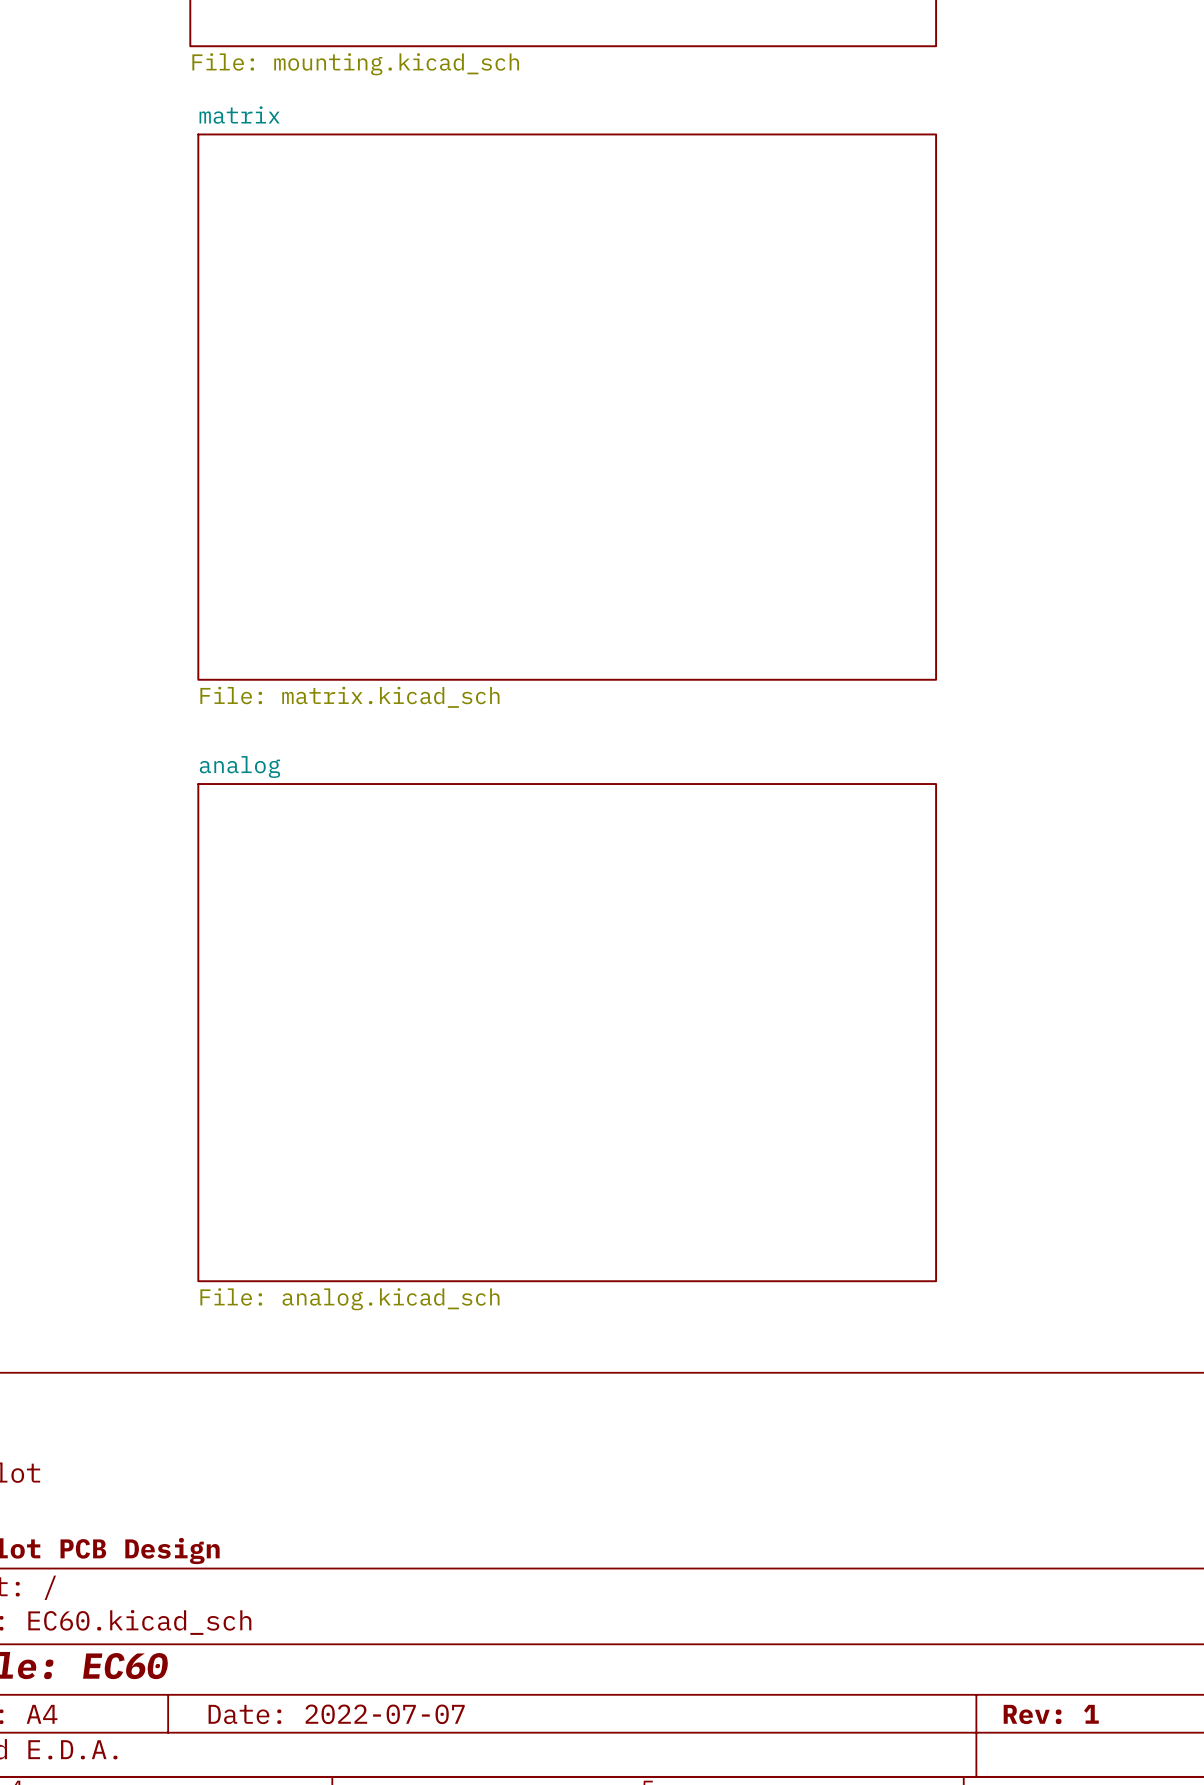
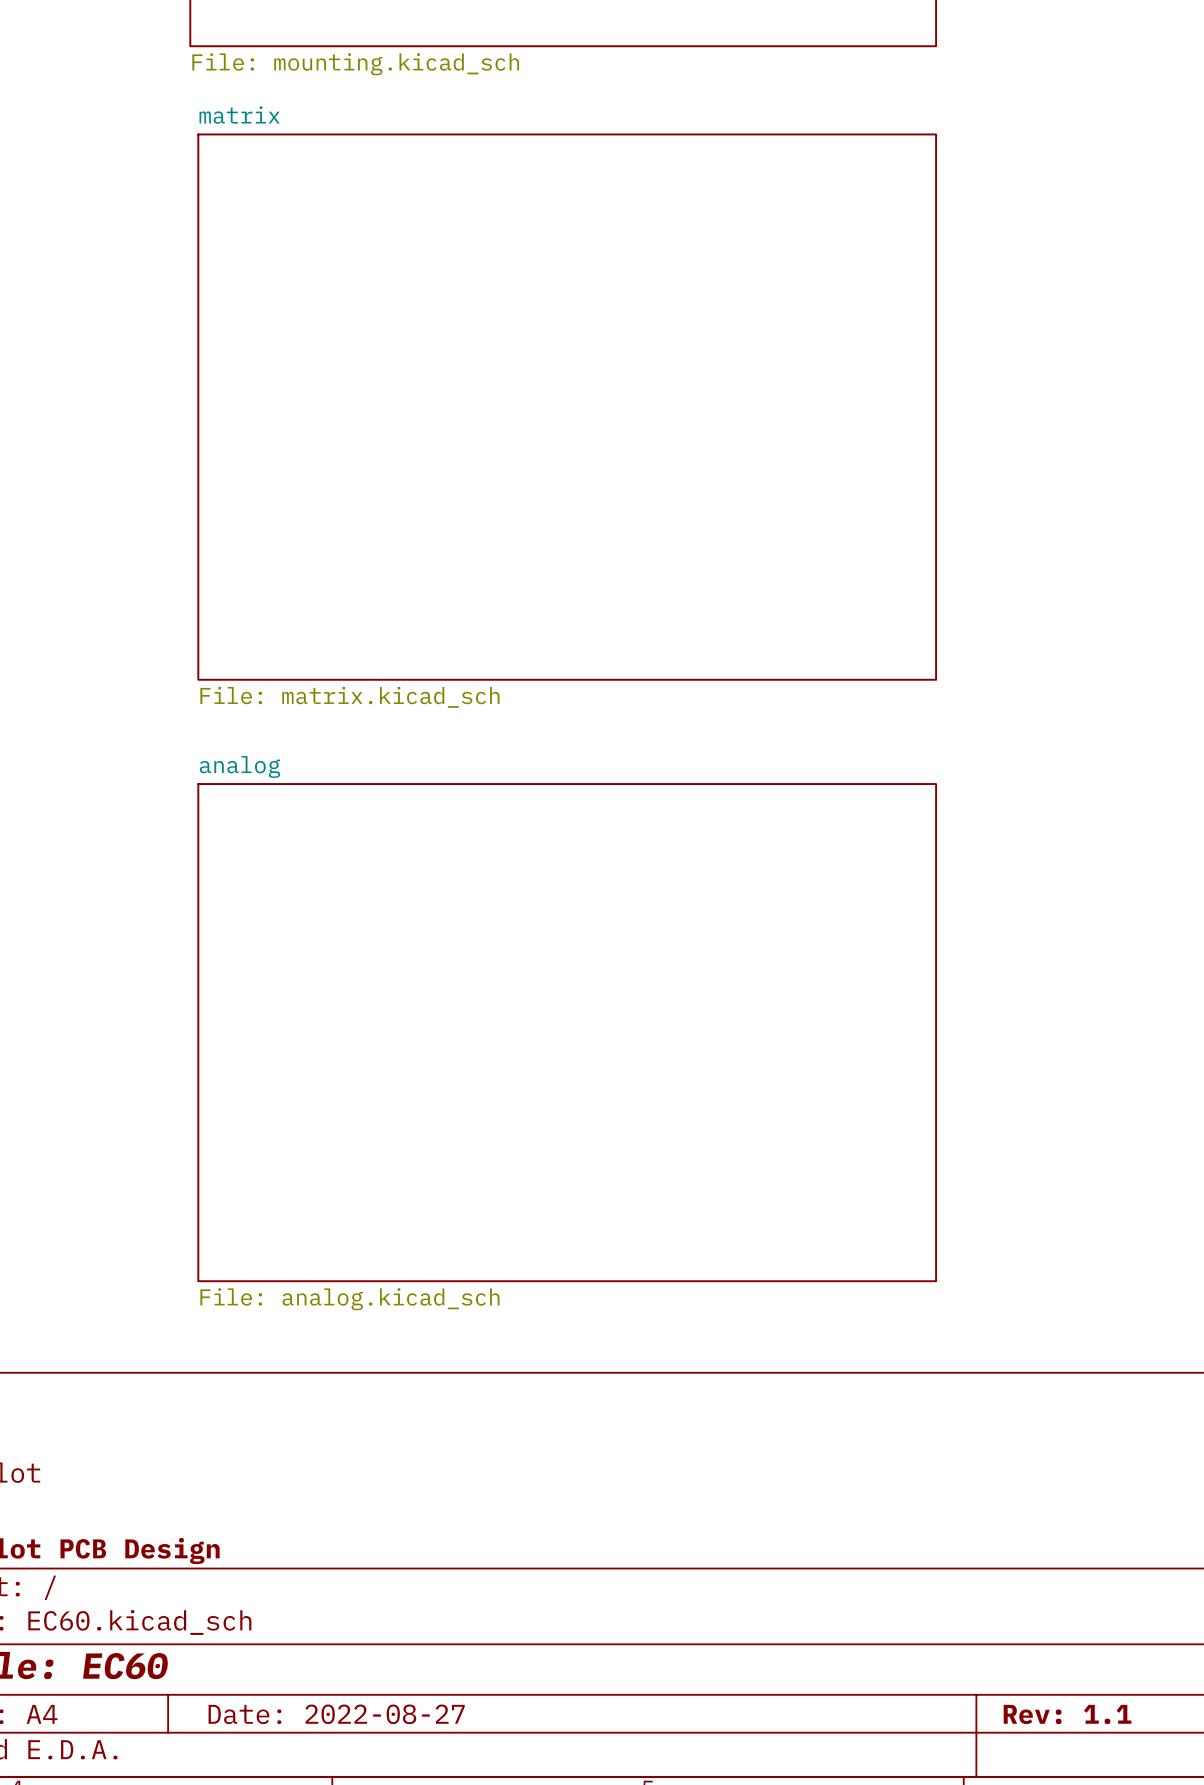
title block: Date: 2022-07-07 (336, 1714) -> Date: 2022-08-27 (336, 1714)
title block: Rev: 1 (1051, 1714) -> Rev: 1.1 (1067, 1714)

